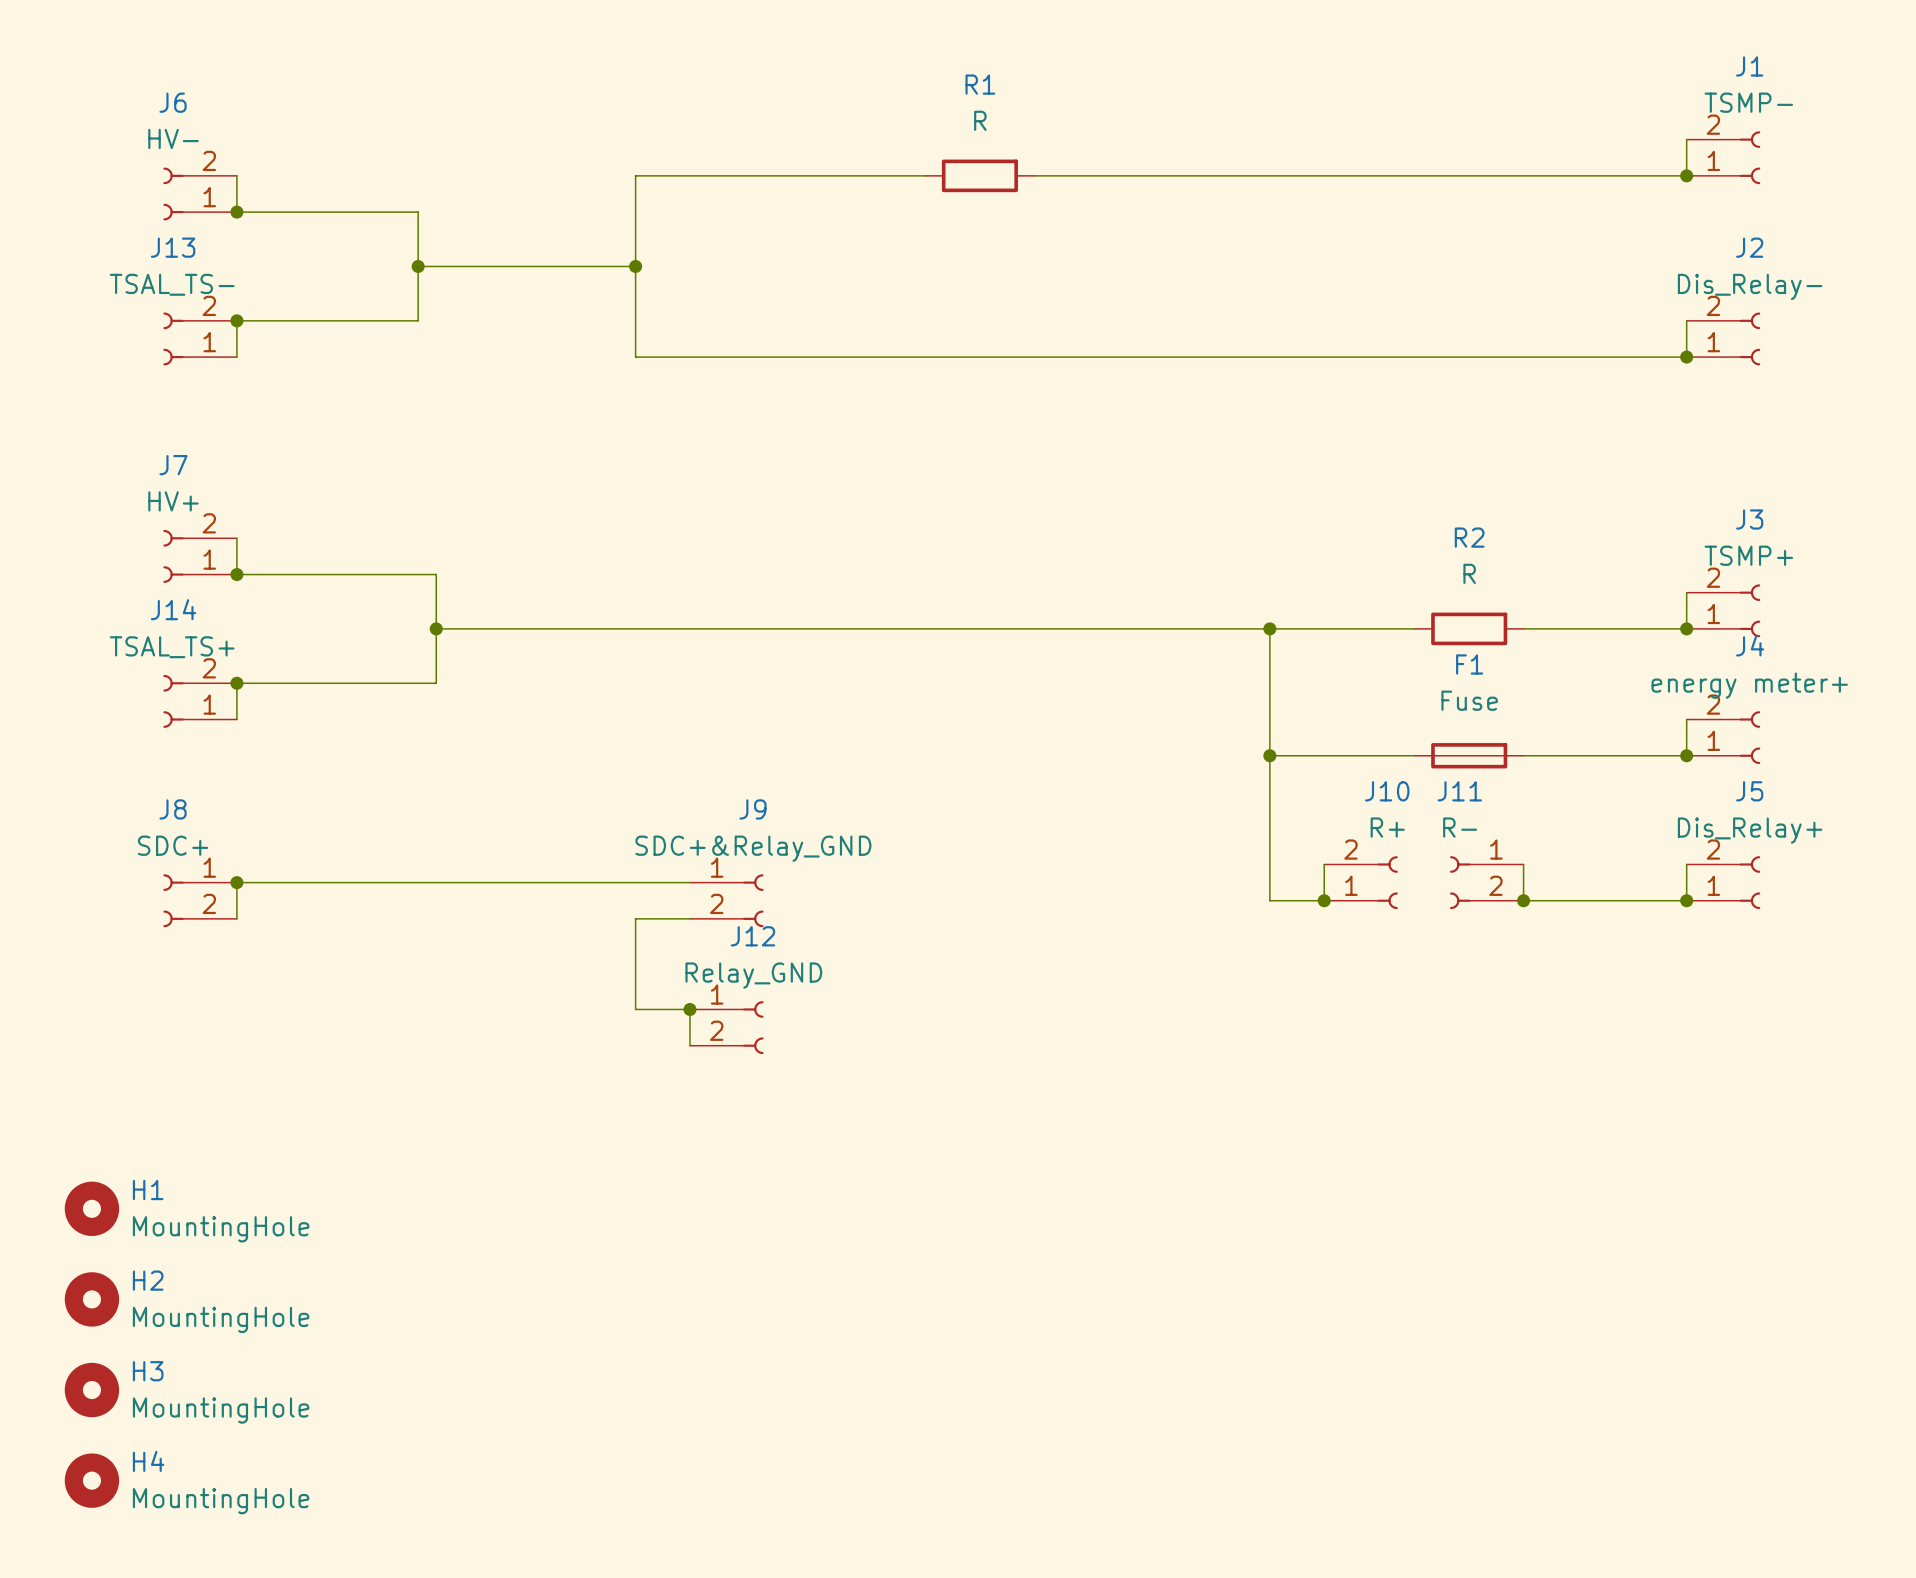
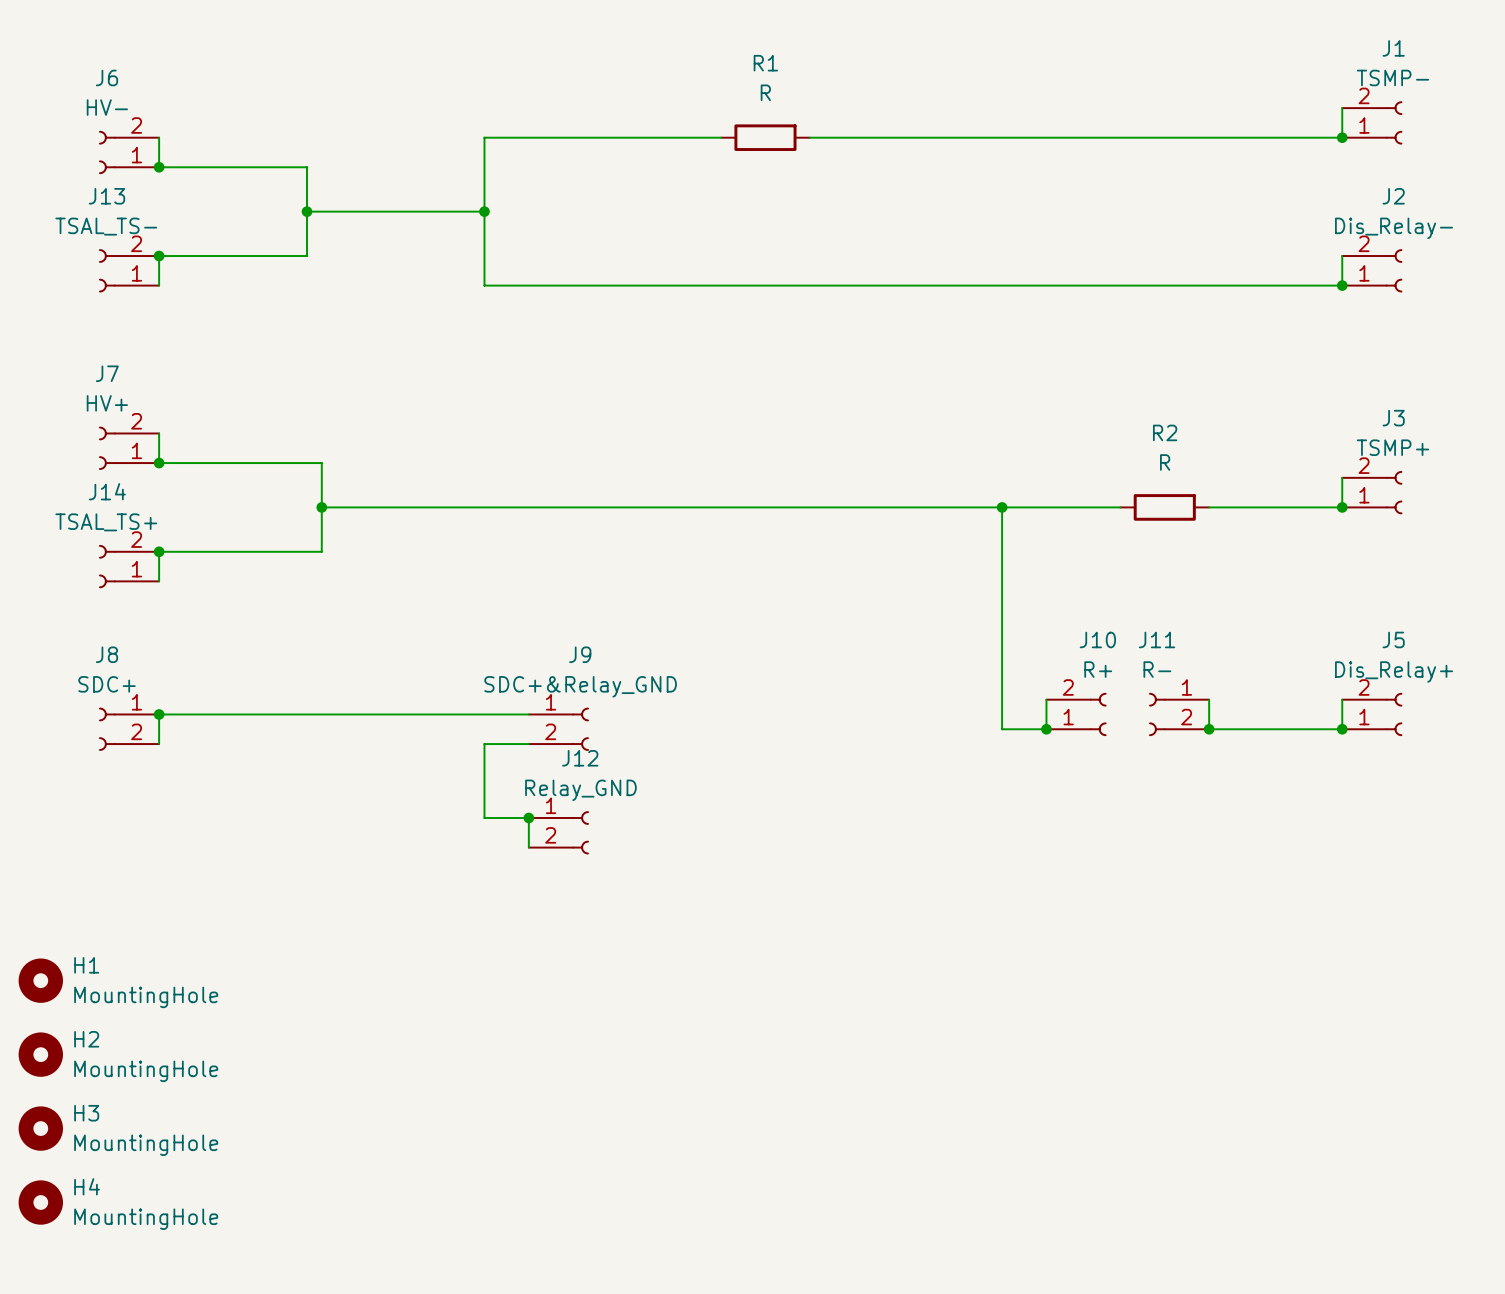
wire: (1686, 719) (1686, 755) (1523, 755) -> none
J4: energy meter+ (1723, 737) -> none
wire: (1269, 755) (1414, 755) -> none
junction: (1269, 755) -> none
F1: Fuse (1469, 755) -> none
junction: (1686, 755) -> none

